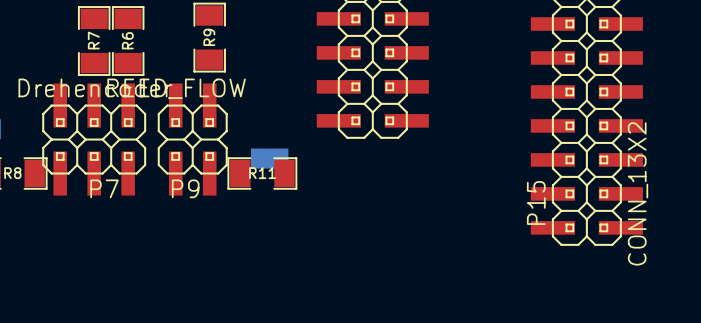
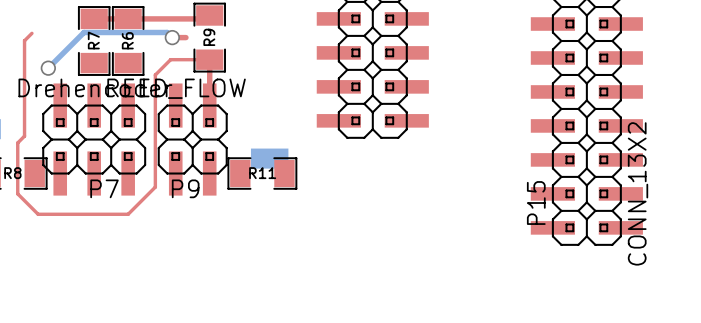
top track: none -> (209, 15) (206, 18) (94, 18)
top track: none -> (31, 33) (24, 40) (24, 136) (17, 142) (17, 193) (38, 214) (128, 214) (155, 187) (155, 74) (170, 59) (209, 59) (209, 105)
top track: none -> (172, 37) (185, 37)
bottom track: none -> (172, 37) (167, 32) (84, 32) (48, 68)
via: none -> (172, 37)
via: none -> (48, 68)

